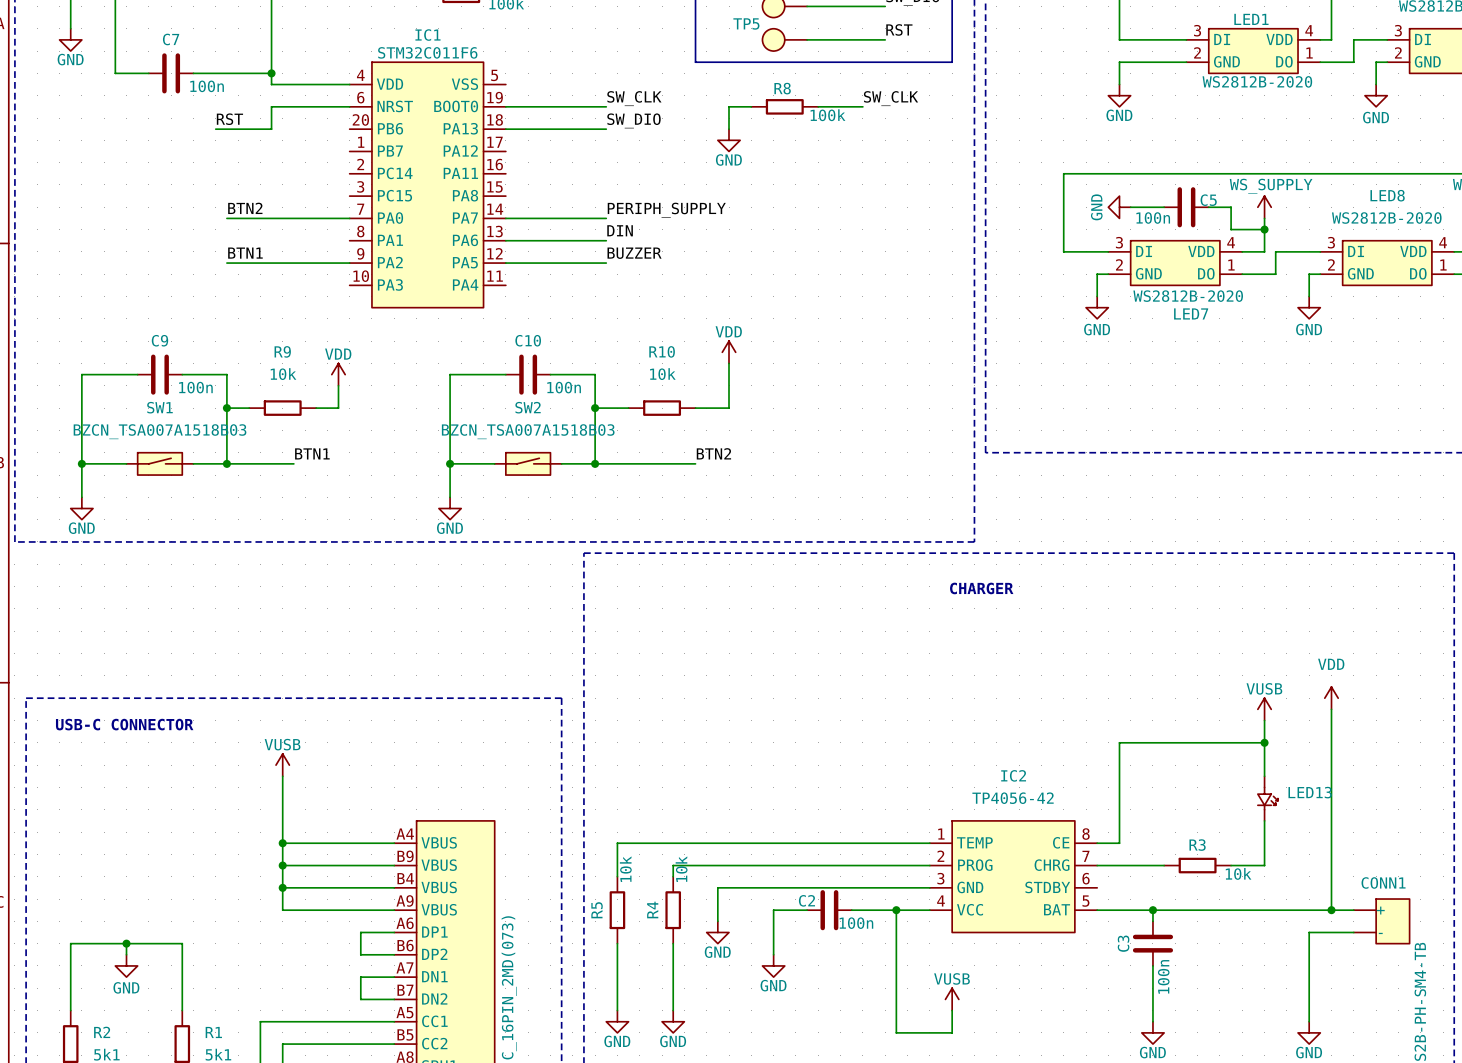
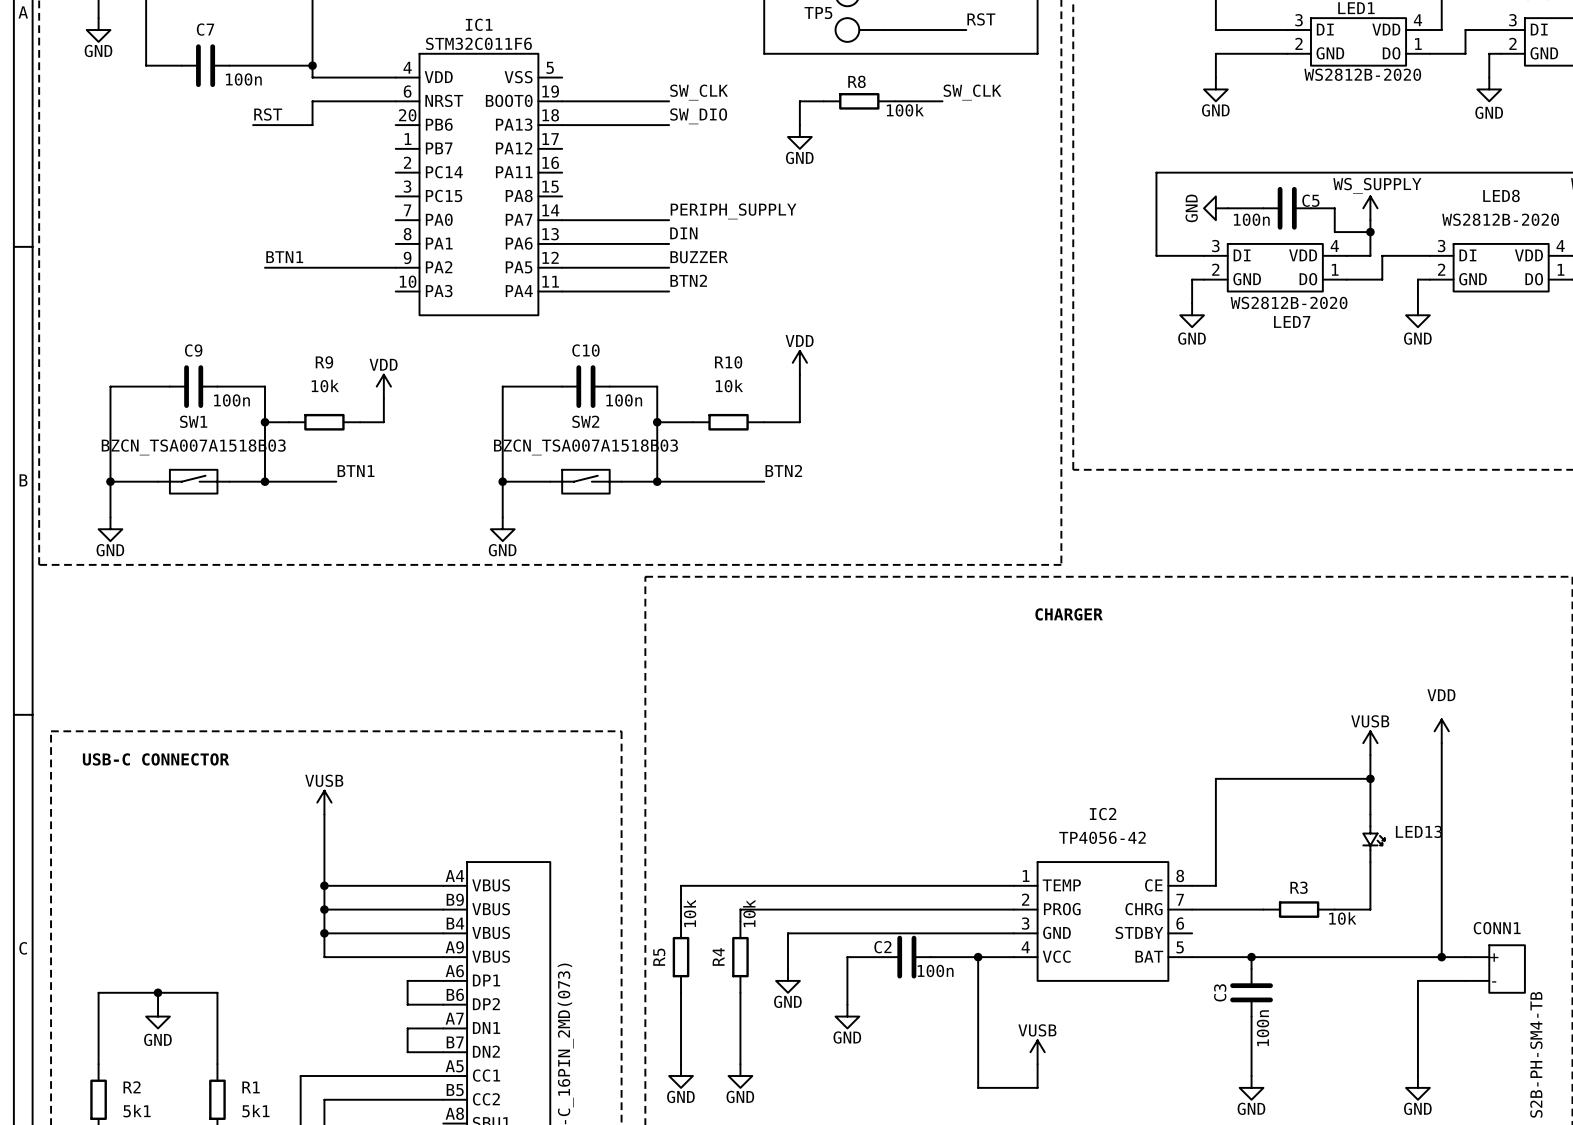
label: BTN2 (245, 208) -> none
wire: (226, 218) (349, 218) -> none
label: none -> BTN2 (688, 280)
wire: none -> (562, 291) (669, 291)

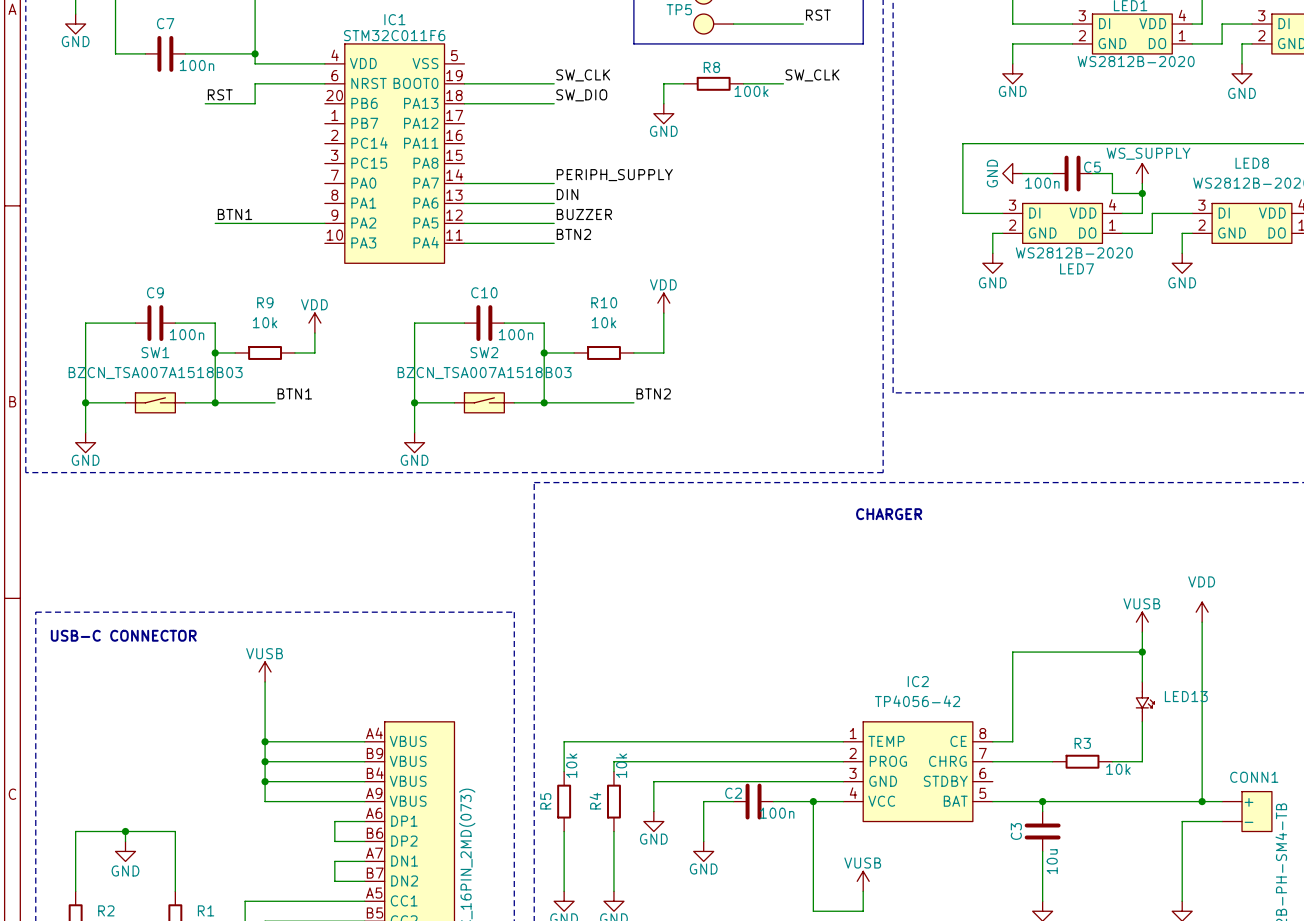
C3 value: 100n (1263, 1028) -> 10u (1052, 861)

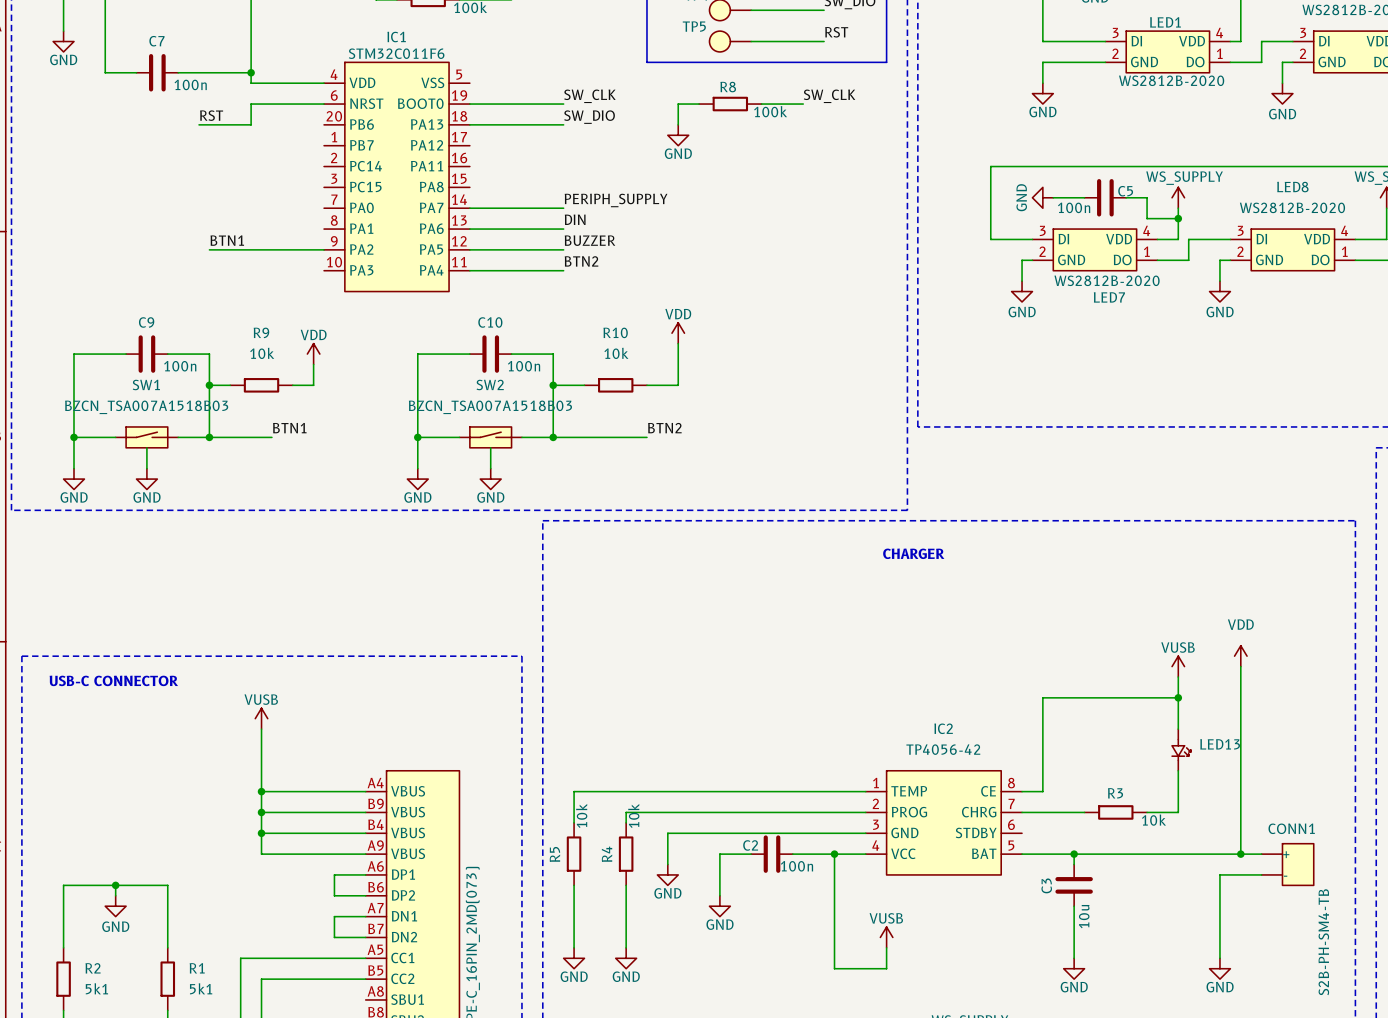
wire: none -> (146, 447) (146, 468)
wire: none -> (490, 447) (490, 468)
power symbol: none -> GND (146, 479)
power symbol: none -> GND (490, 479)

